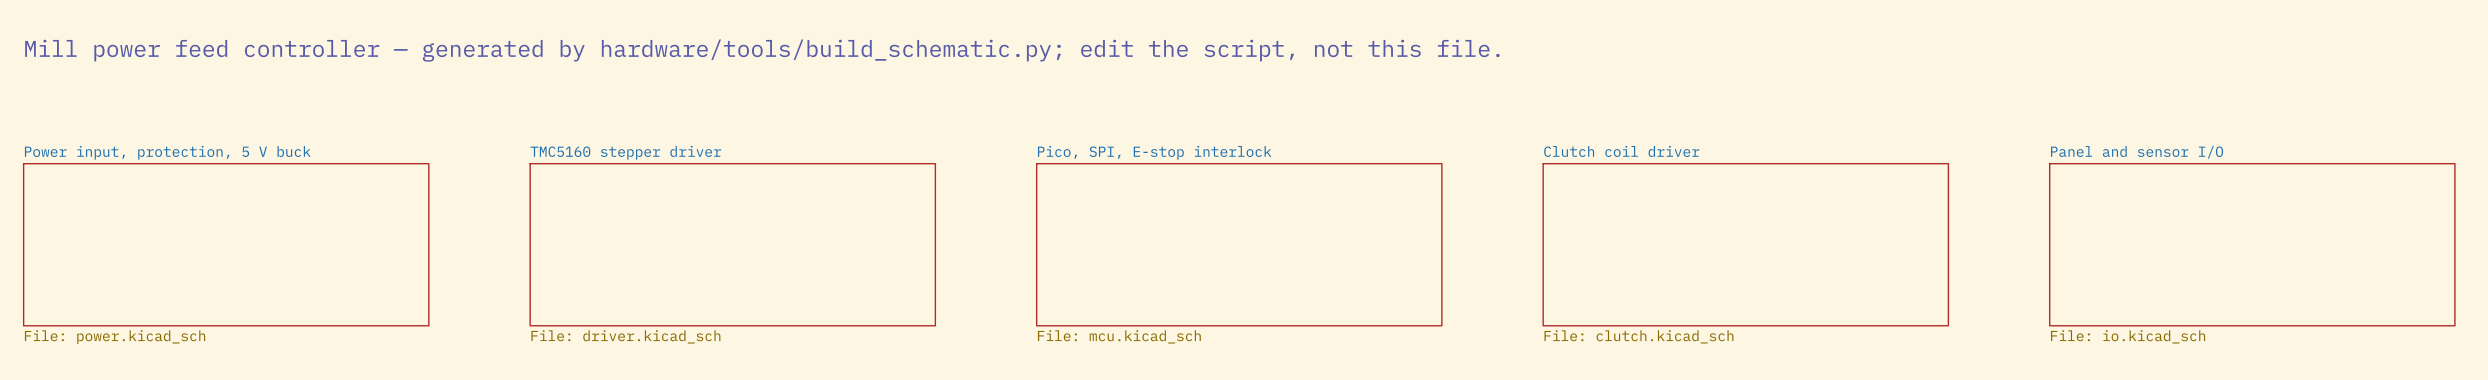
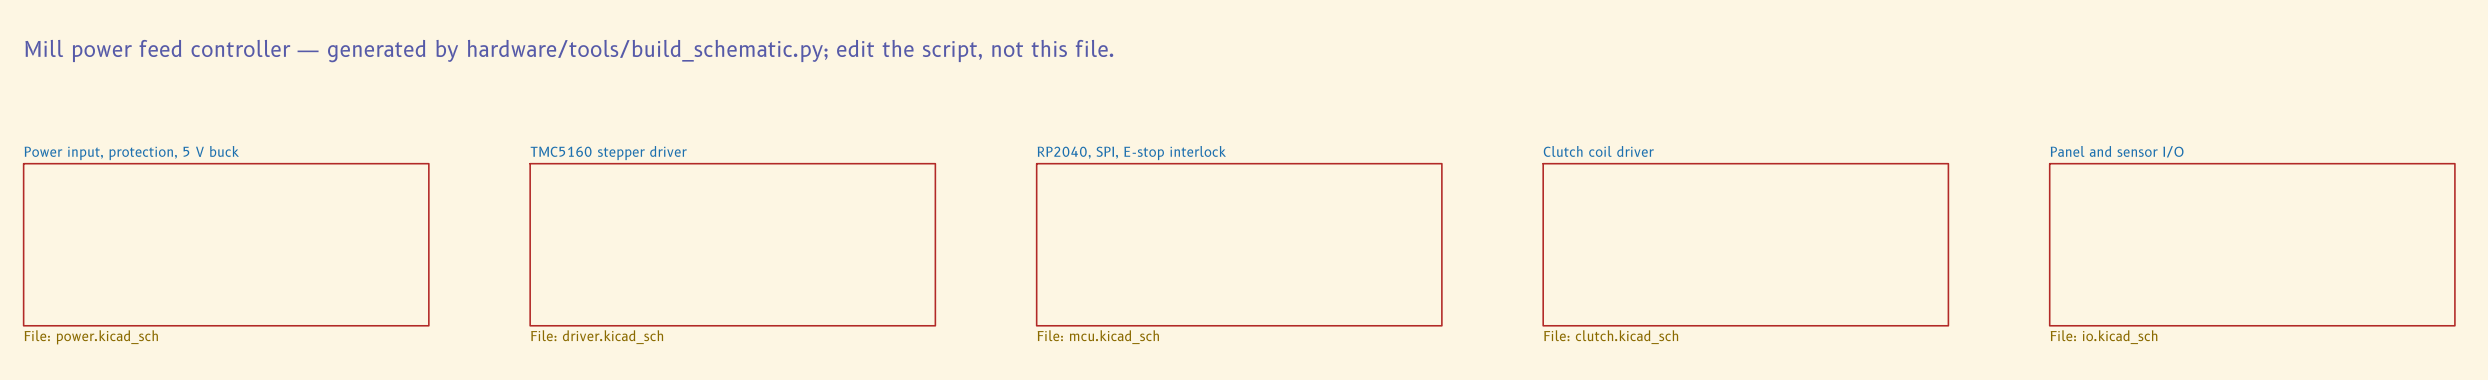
sheet Pico, SPI, E-stop interlock name: Pico, SPI, E-stop interlock (1154, 152) -> RP2040, SPI, E-stop interlock (1131, 153)

